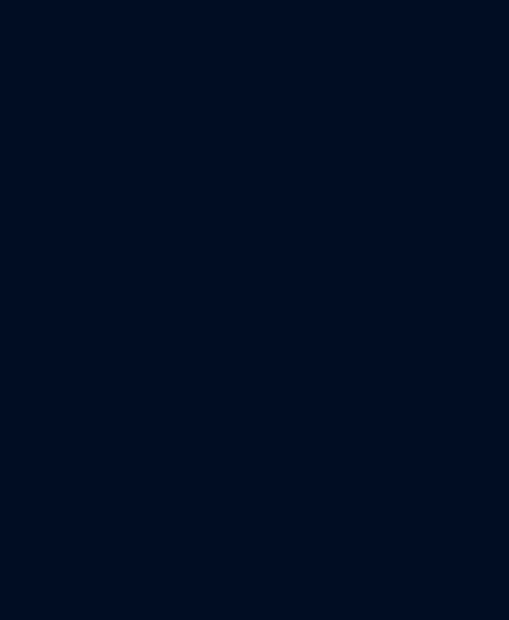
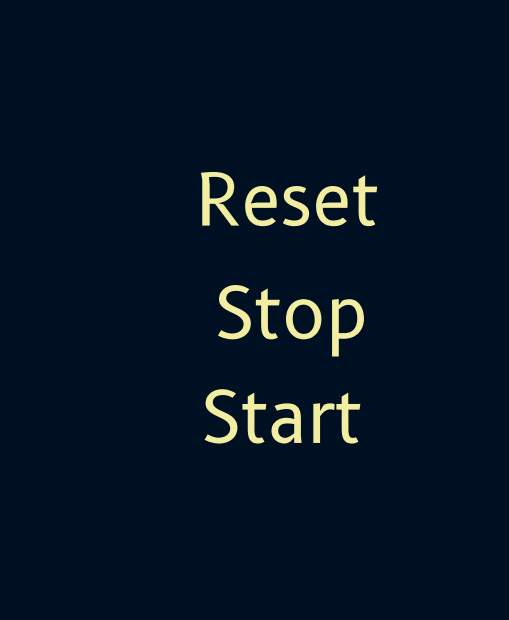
text: none -> Reset (289, 199)
text: none -> Stop (290, 320)
text: none -> Start (282, 416)

